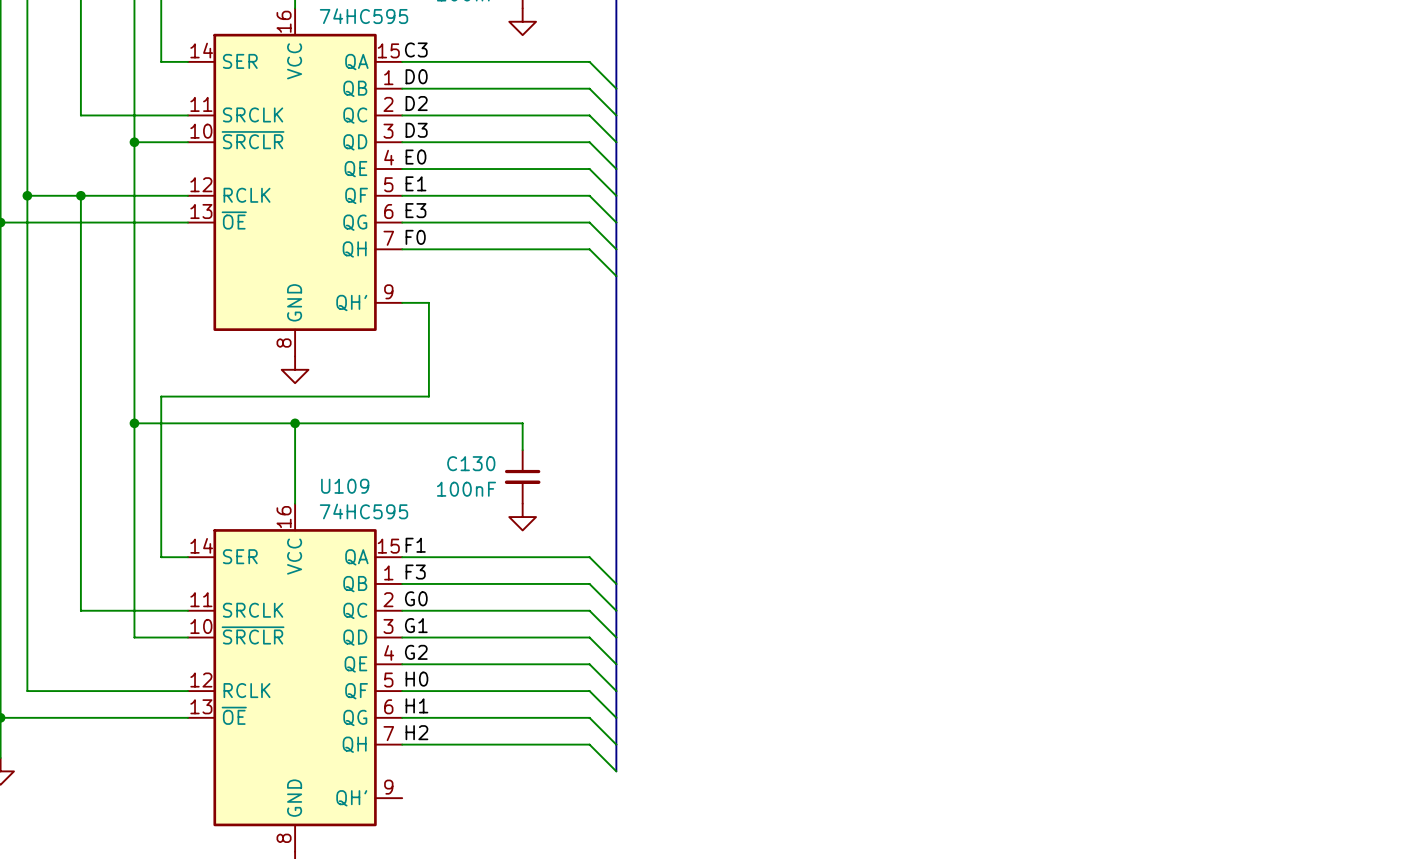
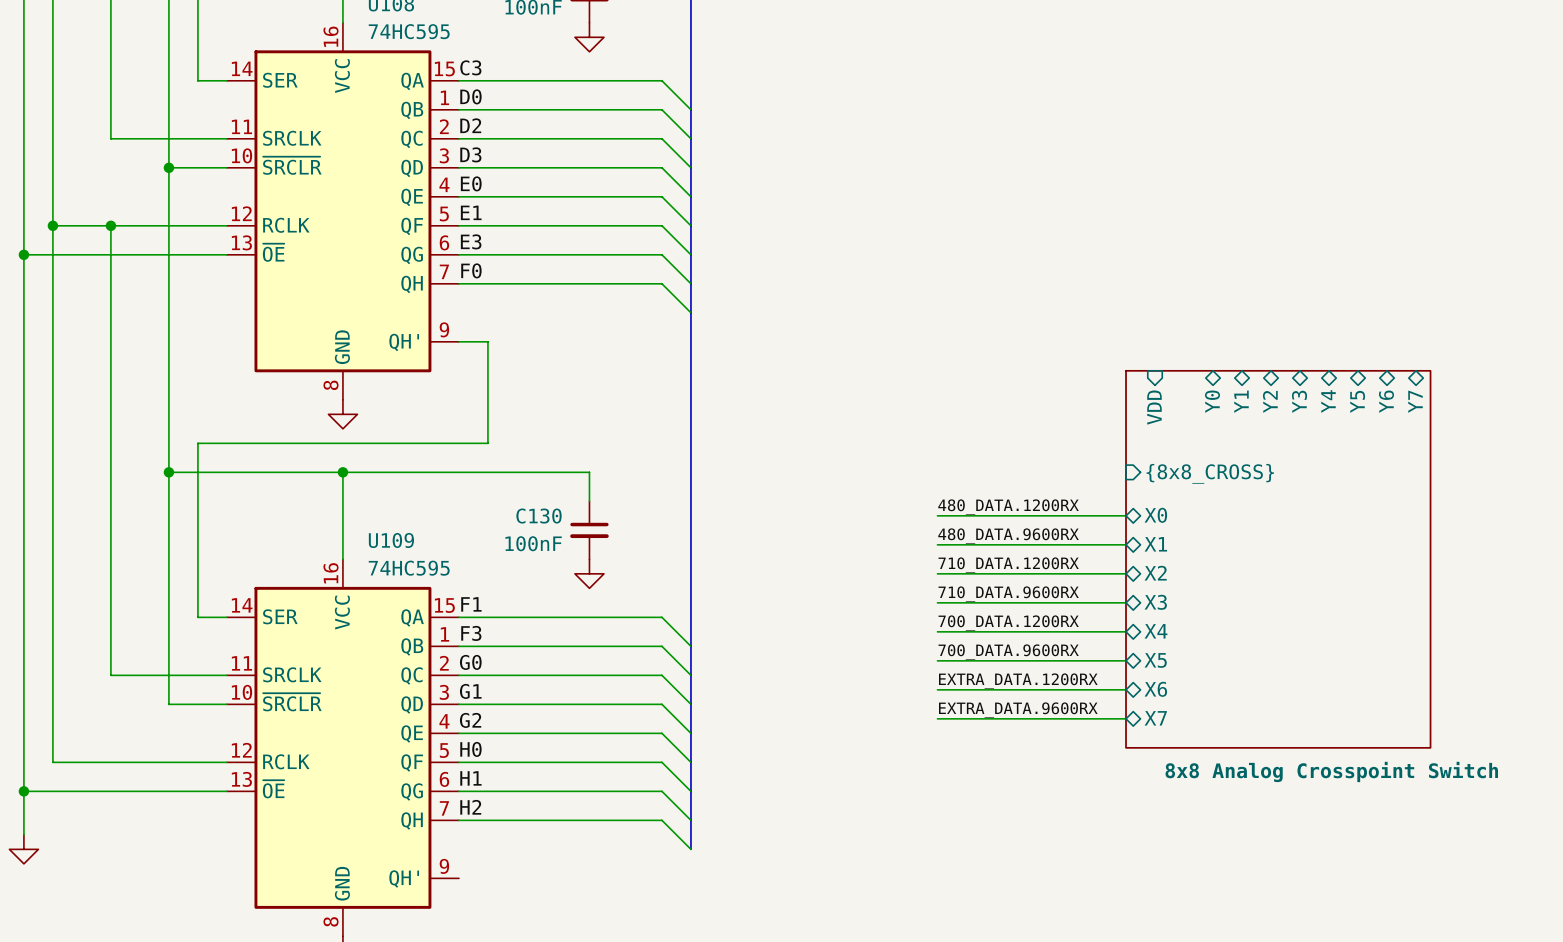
sheet pin: none -> Y0 (1212, 401)
sheet pin: none -> Y1 (1241, 401)
sheet pin: none -> Y2 (1270, 401)
sheet pin: none -> Y3 (1299, 401)
sheet pin: none -> Y4 (1328, 401)
sheet pin: none -> Y5 (1357, 401)
sheet pin: none -> Y6 (1386, 401)
sheet pin: none -> Y7 (1415, 401)
sheet pin: none -> VDD (1154, 407)
sheet pin: none -> {8x8_CROSS} (1210, 473)
label: none -> 480_DATA.1200RX (1008, 507)
wire: none -> (937, 515) (1126, 515)
sheet pin: none -> X0 (1155, 515)
label: none -> 480_DATA.9600RX (1008, 536)
sheet pin: none -> X1 (1155, 544)
wire: none -> (937, 544) (1126, 544)
sheet 8x8 Analog Crosspoint Switch: none -> (1278, 559)
label: none -> 710_DATA.1200RX (1008, 565)
sheet pin: none -> X2 (1155, 573)
wire: none -> (937, 573) (1126, 573)
label: none -> 710_DATA.9600RX (1008, 594)
wire: none -> (937, 602) (1126, 602)
sheet pin: none -> X3 (1155, 602)
label: none -> 700_DATA.1200RX (1008, 623)
sheet pin: none -> X4 (1156, 631)
wire: none -> (937, 631) (1126, 631)
label: none -> 700_DATA.9600RX (1008, 652)
sheet pin: none -> X5 (1155, 660)
wire: none -> (937, 660) (1126, 660)
label: none -> EXTRA_DATA.1200RX (1018, 681)
sheet pin: none -> X6 (1155, 689)
wire: none -> (937, 689) (1126, 689)
label: none -> EXTRA_DATA.9600RX (1018, 710)
wire: none -> (937, 718) (1126, 718)
sheet pin: none -> X7 (1155, 718)

